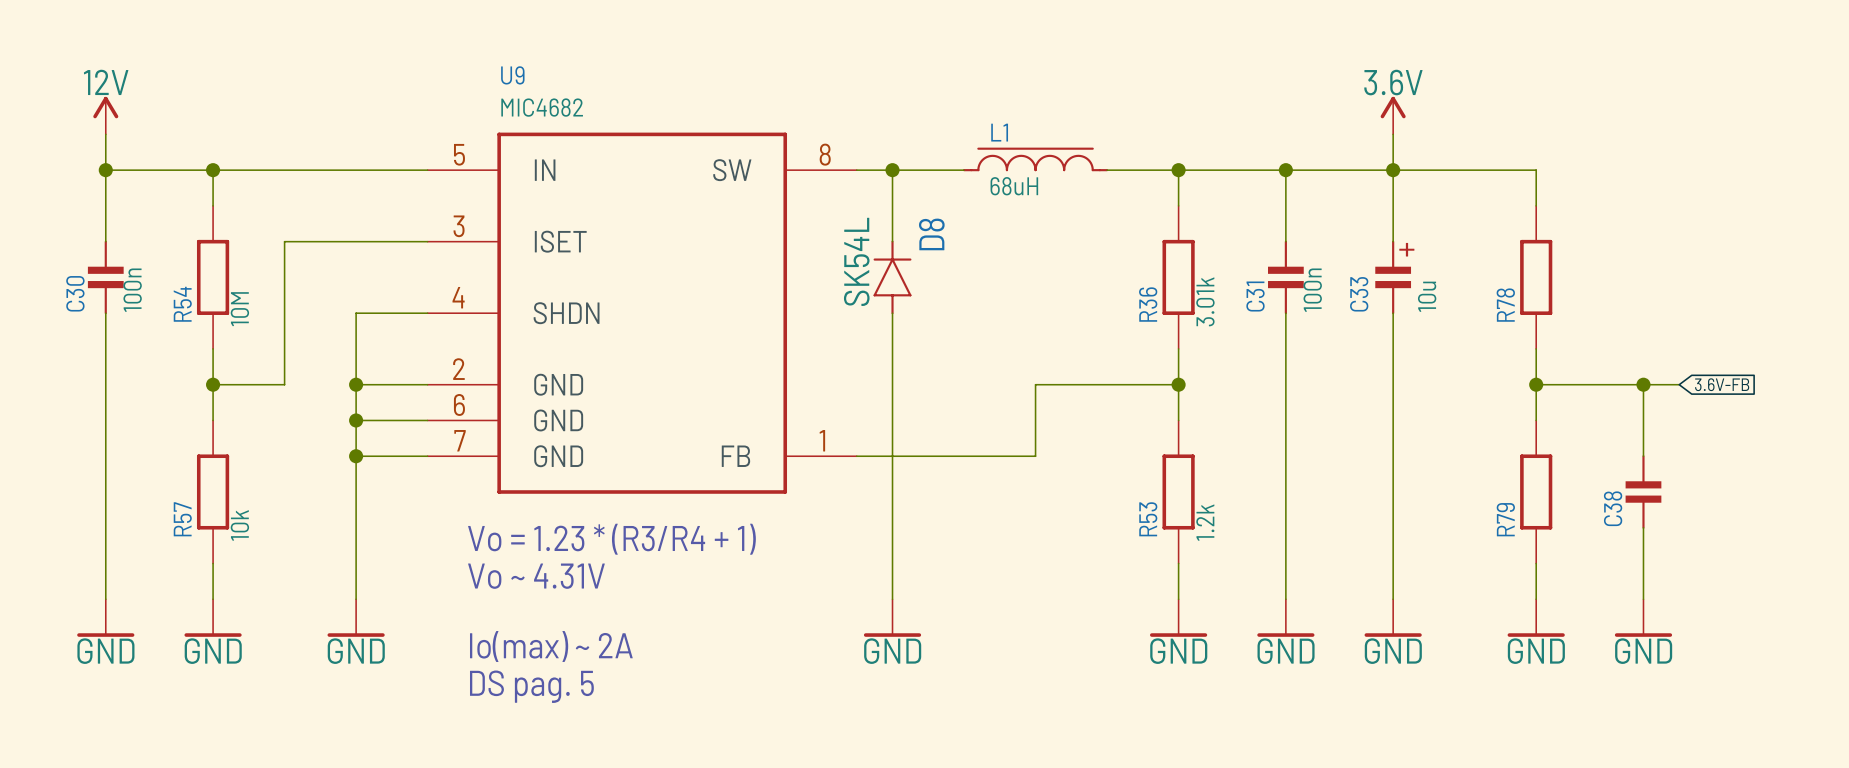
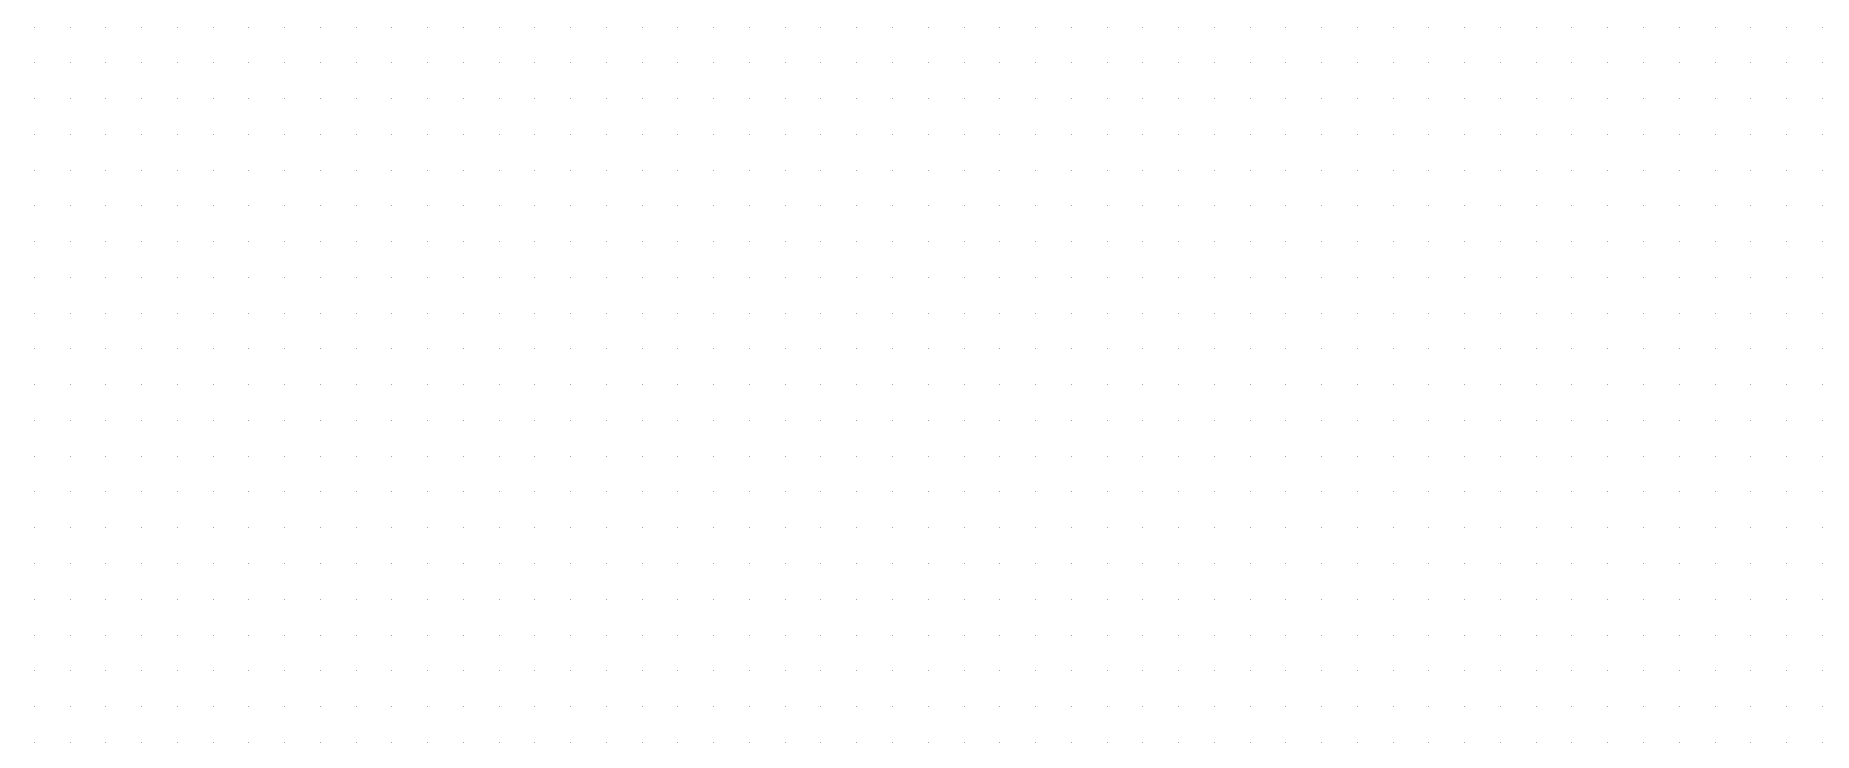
power symbol: 12V (105, 115) -> none
power symbol: 3.6V (1393, 115) -> none
wire: (105, 134) (105, 241) -> none
wire: (1393, 134) (1393, 241) -> none
L1: 68uH (1035, 159) -> none
wire: (105, 170) (427, 170) -> none
junction: (105, 170) -> none
wire: (213, 170) (213, 205) -> none
junction: (213, 170) -> none
wire: (856, 170) (964, 170) -> none
wire: (892, 170) (892, 241) -> none
junction: (892, 170) -> none
wire: (1107, 170) (1536, 170) (1536, 205) -> none
wire: (1178, 170) (1178, 205) -> none
junction: (1178, 170) -> none
wire: (1285, 170) (1285, 241) -> none
junction: (1285, 170) -> none
junction: (1393, 170) -> none
wire: (427, 241) (284, 241) (284, 384) (213, 384) -> none
C30: 100n (105, 277) -> none
R54: 10M (213, 277) -> none
D8: SK54L (892, 277) -> none
R36: 3.01k (1178, 277) -> none
C31: 100n (1285, 277) -> none
C33: 10u (1393, 277) -> none
R78: (1536, 277) -> none
wire: (105, 313) (105, 599) -> none
wire: (427, 313) (356, 313) (356, 599) -> none
U9: MIC4682 (642, 313) -> none
wire: (892, 313) (892, 599) -> none
wire: (1285, 313) (1285, 599) -> none
wire: (1393, 313) (1393, 599) -> none
wire: (213, 348) (213, 420) -> none
wire: (1178, 348) (1178, 420) -> none
wire: (1536, 348) (1536, 420) -> none
junction: (213, 384) -> none
wire: (356, 384) (427, 384) -> none
junction: (356, 384) -> none
wire: (1178, 384) (1035, 384) (1035, 456) (856, 456) -> none
junction: (1178, 384) -> none
wire: (1536, 384) (1679, 384) -> none
junction: (1536, 384) -> none
wire: (1643, 384) (1643, 456) -> none
junction: (1643, 384) -> none
global label: 3.6V-FB (1722, 384) -> none
wire: (356, 420) (427, 420) -> none
junction: (356, 420) -> none
wire: (356, 456) (427, 456) -> none
junction: (356, 456) -> none
R57: 10k (213, 491) -> none
R53: 1.2k (1178, 491) -> none
R79: (1536, 491) -> none
C38: (1643, 491) -> none
wire: (1643, 527) (1643, 599) -> none
text: Vo = 1.23 * (R3/R4 + 1) (611, 539) -> none
wire: (213, 563) (213, 599) -> none
wire: (1178, 563) (1178, 599) -> none
wire: (1536, 563) (1536, 599) -> none
text: Vo ~ 4.31V (536, 576) -> none
power symbol: GND (105, 618) -> none
power symbol: GND (213, 618) -> none
power symbol: GND (356, 618) -> none
power symbol: GND (892, 618) -> none
power symbol: GND (1178, 618) -> none
power symbol: GND (1285, 618) -> none
power symbol: GND (1393, 618) -> none
power symbol: GND (1536, 618) -> none
power symbol: GND (1643, 618) -> none
text: Io(max) ~ 2A (551, 646) -> none
text: DS pag. 5 (531, 686) -> none

